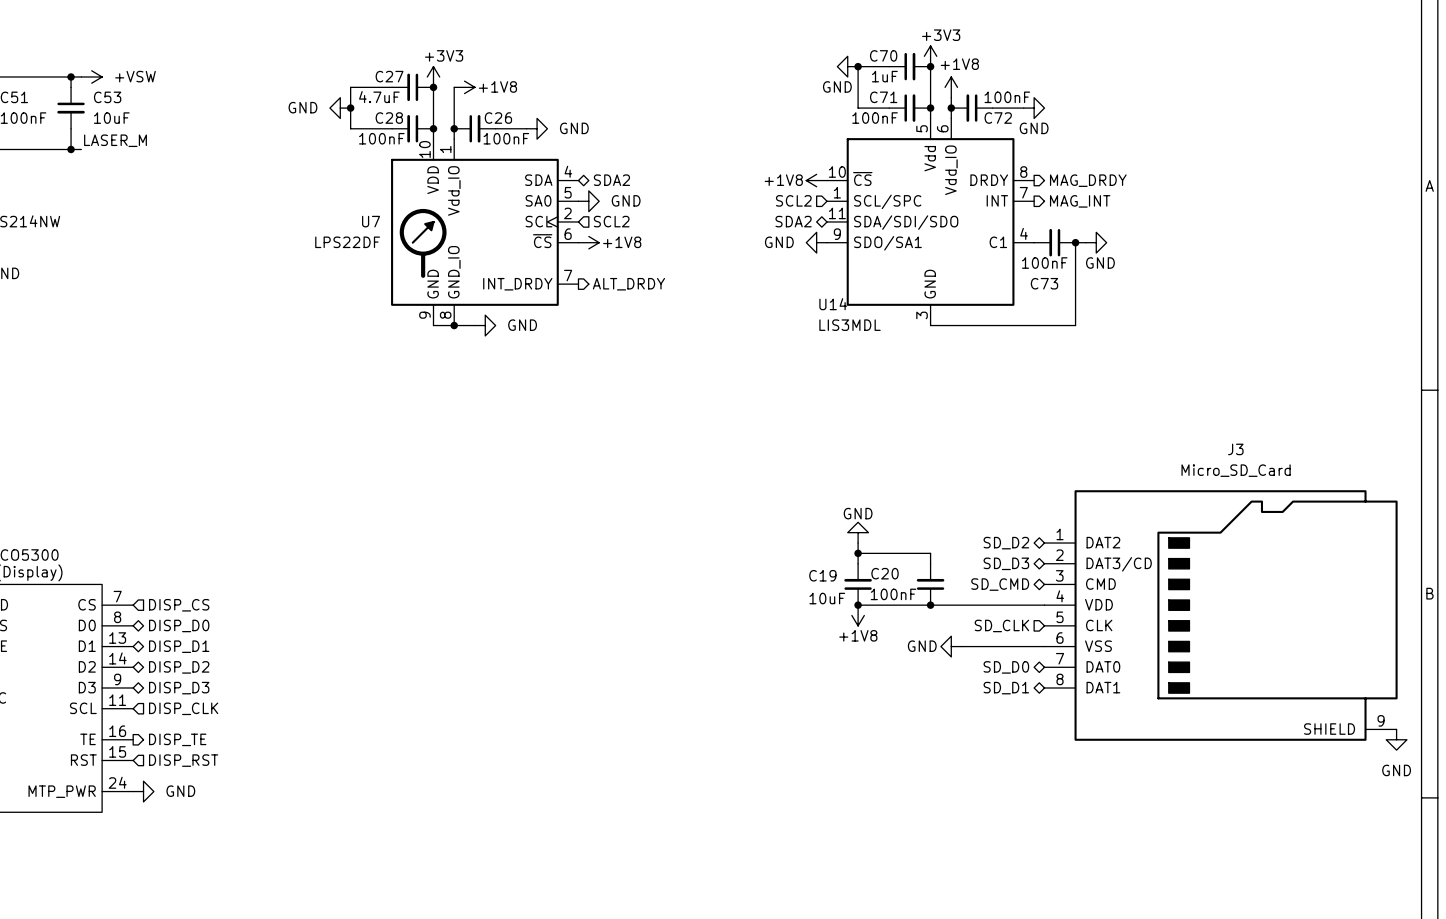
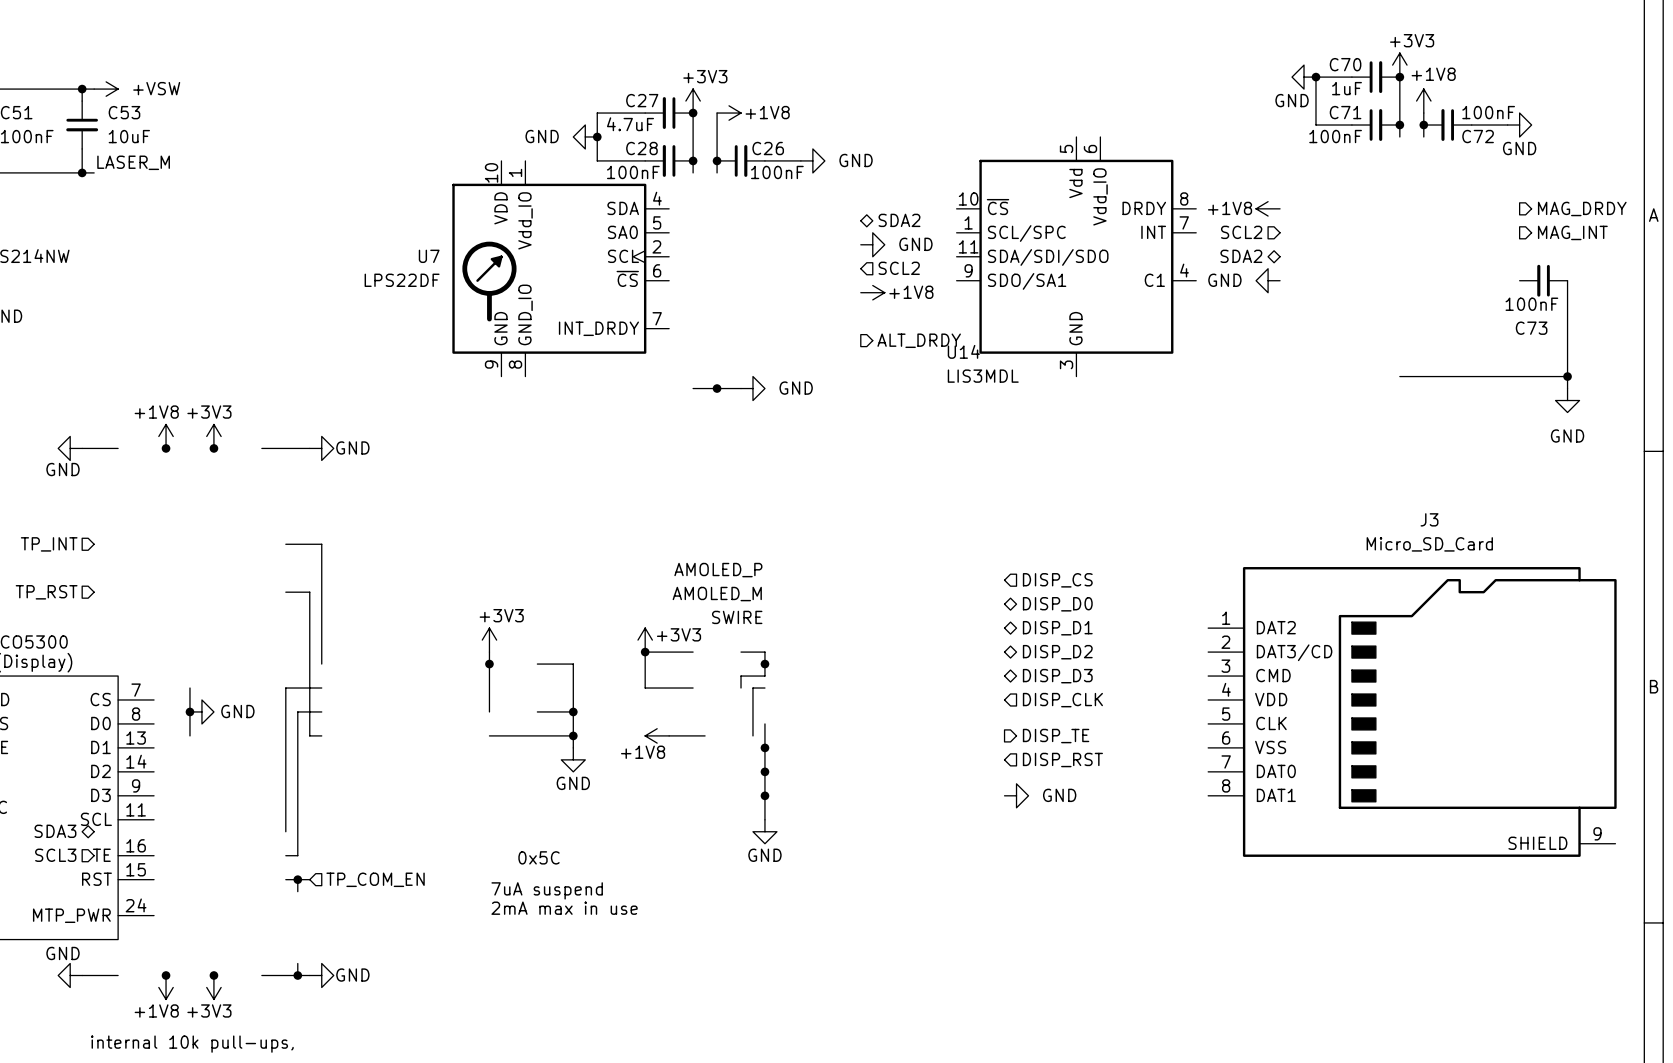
power symbol: +3V3 (930, 56) -> none
power symbol: none -> +3V3 (1399, 65)
power symbol: GND (847, 66) -> none
junction: (858, 66) -> none
wire: (889, 66) (858, 66) (858, 108) (889, 108) -> none
C70 position: (909, 66) -> (1375, 77)
wire: (930, 66) (930, 118) -> none
junction: (930, 66) -> none
junction: none -> (1315, 77)
wire: none -> (1351, 77) (1315, 77) (1315, 125) (1351, 125)
wire: none -> (1399, 77) (1399, 136)
junction: none -> (1399, 77)
power symbol position: +3V3 (433, 77) -> +3V3 (693, 101)
wire: (392, 87) (350, 87) (350, 128) (392, 128) -> (645, 113) (597, 113) (597, 160) (645, 160)
C27 position: (412, 87) -> (669, 113)
wire: (433, 87) (433, 139) -> (693, 113) (693, 172)
junction: (433, 87) -> none
wire: (454, 87) (454, 139) -> (717, 113) (717, 172)
power symbol: +1V8 (464, 87) -> none
power symbol: +1V8 (951, 87) -> none
power symbol: none -> +1V8 (1423, 101)
junction: none -> (693, 113)
power symbol: none -> +1V8 (729, 113)
wire: (951, 97) (951, 118) -> none
wire: none -> (1423, 113) (1423, 136)
power symbol: GND (340, 108) -> none
junction: (350, 108) -> none
C71 position: (909, 108) -> (1375, 125)
junction: (930, 108) -> none
junction: (951, 108) -> none
C72 position: (972, 108) -> (1447, 125)
wire: (992, 108) (1023, 108) -> none
power symbol rotation: 0° (1034, 108) -> 180° (1304, 77)
power symbol position: GND (1034, 108) -> GND (1304, 77)
junction: none -> (1399, 125)
junction: none -> (1423, 125)
wire: none -> (1471, 125) (1507, 125)
power symbol: none -> GND (1519, 125)
junction: none -> (597, 136)
C28 position: (412, 128) -> (669, 160)
junction: (433, 128) -> none
junction: (454, 128) -> none
C26 position: (474, 128) -> (741, 160)
wire: (495, 128) (526, 128) -> (764, 160) (800, 160)
power symbol rotation: 0° (537, 128) -> 180° (585, 136)
power symbol position: GND (537, 128) -> GND (585, 136)
junction: none -> (693, 160)
junction: none -> (717, 160)
power symbol: none -> GND (812, 160)
hierarchical label: SDA2 (611, 180) -> none
power symbol: +1V8 (816, 180) -> none
hierarchical label: MAG_DRDY (1088, 180) -> none
power symbol: none -> +1V8 (1268, 208)
hierarchical label: none -> MAG_DRDY (1582, 208)
hierarchical label rotation: 0° (793, 200) -> 180° (899, 268)
hierarchical label: none -> SCL2 (1241, 232)
power symbol: GND (588, 201) -> none
hierarchical label: MAG_INT (1080, 201) -> none
hierarchical label: none -> MAG_INT (1572, 232)
hierarchical label: SCL2 (611, 221) -> none
hierarchical label rotation: 0° (793, 221) -> 180° (899, 220)
hierarchical label: none -> SDA2 (1241, 256)
power symbol: +1V8 (588, 242) -> none
power symbol rotation: 0° (816, 242) -> 180° (872, 244)
power symbol position: GND (816, 242) -> GND (872, 244)
C73 position: (1054, 242) -> (1543, 280)
junction: (1075, 242) -> none
wire: (1085, 242) (1075, 242) (1075, 325) (930, 325) -> none
power symbol rotation: 0° (1096, 242) -> 180° (1268, 280)
wire: none -> (1567, 280) (1567, 388)
power symbol: none -> +1V8 (872, 292)
power symbol text position: GND (1100, 263) -> GND (1224, 280)
hierarchical label position: ALT_DRDY (628, 284) -> ALT_DRDY (919, 340)
wire: (433, 325) (474, 325) -> (693, 388) (741, 388)
junction: (454, 325) -> none
power symbol: GND (485, 325) -> none
wire: none -> (1399, 376) (1567, 376)
junction: none -> (1567, 376)
junction: none -> (717, 388)
power symbol: none -> GND (752, 388)
power symbol: none -> GND (1567, 400)
power symbol: none -> +1V8 (166, 436)
power symbol: none -> +3V3 (213, 436)
power symbol: none -> GND (70, 448)
wire: none -> (82, 448) (118, 448)
junction: none -> (166, 448)
junction: none -> (213, 448)
wire: none -> (261, 448) (309, 448)
power symbol: none -> GND (321, 448)
hierarchical label: none -> TP_INT (49, 544)
wire: none -> (285, 544) (321, 544) (321, 664)
label: none -> AMOLED_P (718, 570)
hierarchical label: none -> DISP_CS (1057, 580)
wire: none -> (285, 592) (309, 592) (309, 735) (321, 735)
hierarchical label: none -> TP_RST (46, 592)
label: none -> AMOLED_M (717, 594)
hierarchical label: none -> DISP_D0 (1057, 604)
power symbol: GND (858, 532) -> none
label: none -> SWIRE (737, 617)
wire: (858, 543) (858, 563) -> none
hierarchical label: none -> DISP_D1 (1057, 628)
hierarchical label: SD_D2 (1006, 543) -> none
power symbol: none -> +3V3 (489, 640)
power symbol: none -> +3V3 (645, 640)
wire: (858, 553) (930, 553) (930, 563) -> none
junction: (858, 553) -> none
wire: none -> (489, 652) (489, 711)
junction: none -> (645, 652)
wire: none -> (693, 652) (645, 652) (645, 688) (693, 688)
wire: none -> (741, 652) (764, 652) (764, 676) (741, 676) (741, 688)
hierarchical label: none -> DISP_D2 (1057, 652)
hierarchical label: SD_D3 (1006, 563) -> none
junction: none -> (489, 664)
wire: none -> (537, 664) (573, 664) (573, 747)
junction: none -> (764, 664)
C19: 10uF (858, 584) -> none
hierarchical label: none -> DISP_D3 (1057, 676)
C20: 100nF (930, 584) -> none
hierarchical label: SD_CMD (1000, 584) -> none
wire: none -> (189, 688) (189, 735)
wire: none -> (321, 688) (285, 688) (285, 831)
wire: none -> (764, 688) (752, 688) (752, 735)
hierarchical label: DISP_CS (179, 605) -> none
wire: (858, 605) (1044, 605) -> none
junction: (858, 605) -> none
junction: (930, 605) -> none
junction: none -> (189, 711)
power symbol: none -> GND (201, 711)
wire: none -> (321, 711) (297, 711) (297, 855) (285, 855)
wire: none -> (537, 711) (573, 711)
junction: none -> (573, 711)
power symbol: +1V8 (858, 615) -> none
hierarchical label: DISP_D0 (179, 625) -> none
wire: none -> (764, 723) (764, 819)
hierarchical label: SD_CLK (1001, 625) -> DISP_CLK (1062, 700)
wire: none -> (489, 735) (573, 735)
junction: none -> (573, 735)
power symbol: none -> +1V8 (657, 735)
wire: none -> (669, 735) (705, 735)
hierarchical label: none -> DISP_TE (1056, 736)
hierarchical label: DISP_D1 (179, 646) -> none
junction: none -> (764, 747)
power symbol: GND (951, 646) -> none
wire: (961, 646) (1044, 646) -> none
power symbol: none -> GND (573, 759)
hierarchical label: none -> DISP_RST (1062, 760)
hierarchical label: DISP_D2 (179, 667) -> none
junction: none -> (764, 771)
hierarchical label: SD_D0 (1006, 667) -> none
junction: none -> (764, 795)
power symbol: none -> GND (1016, 795)
hierarchical label: DISP_D3 (179, 688) -> none
hierarchical label: SD_D1 (1006, 688) -> none
hierarchical label: DISP_CLK (183, 708) -> none
hierarchical label: none -> SDA3 (55, 831)
power symbol: none -> GND (764, 831)
hierarchical label: none -> SCL3 (55, 855)
hierarchical label: DISP_TE (177, 739) -> none
power symbol: GND (1396, 739) -> none
text: none -> 0x5C (539, 857)
hierarchical label: DISP_RST (183, 760) -> none
wire: none -> (285, 879) (309, 879)
wire: none -> (297, 879) (297, 891)
junction: none -> (297, 879)
hierarchical label: none -> TP_COM_EN (375, 879)
text: none -> 7uA suspend (547, 890)
text: none -> 2mA max in use (564, 908)
power symbol: GND (143, 791) -> none
wire: none -> (297, 963) (297, 975)
power symbol: none -> GND (70, 975)
wire: none -> (82, 975) (118, 975)
junction: none -> (166, 975)
junction: none -> (213, 975)
wire: none -> (261, 975) (309, 975)
junction: none -> (297, 975)
power symbol: none -> GND (321, 975)
power symbol: none -> +1V8 (166, 987)
power symbol: none -> +3V3 (213, 987)
text: none -> internal 10k pull-ups, (192, 1044)

